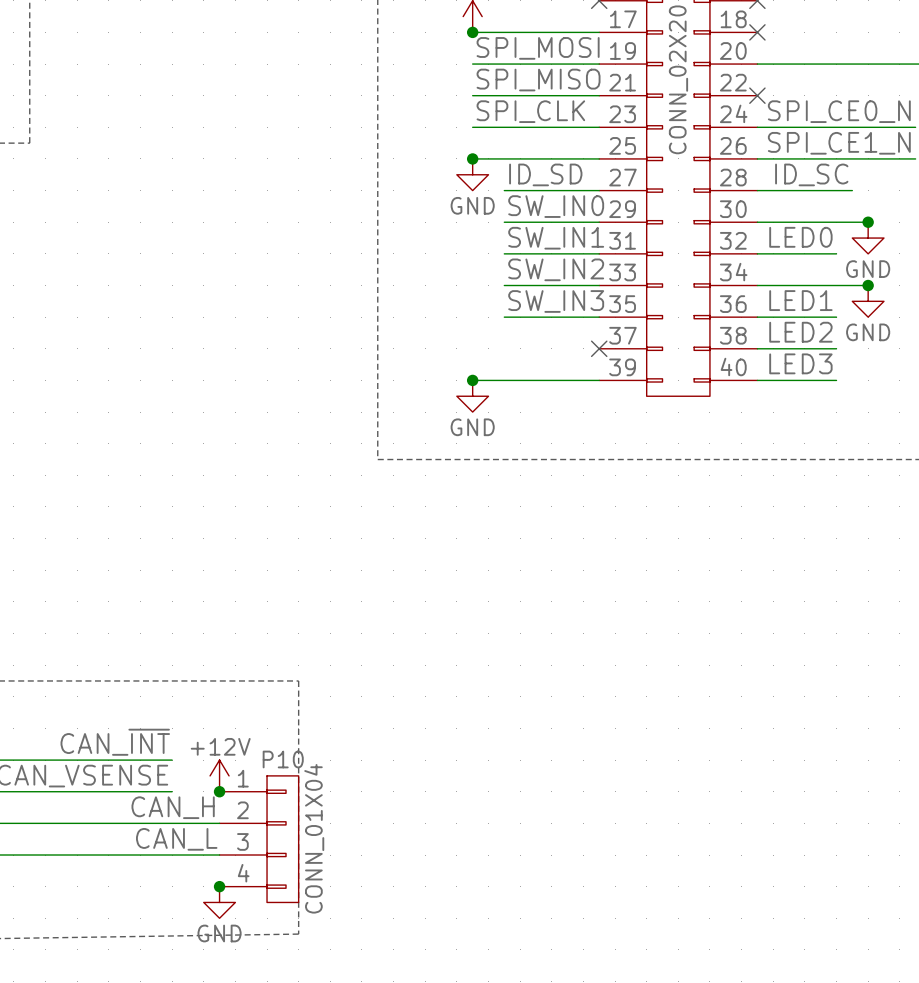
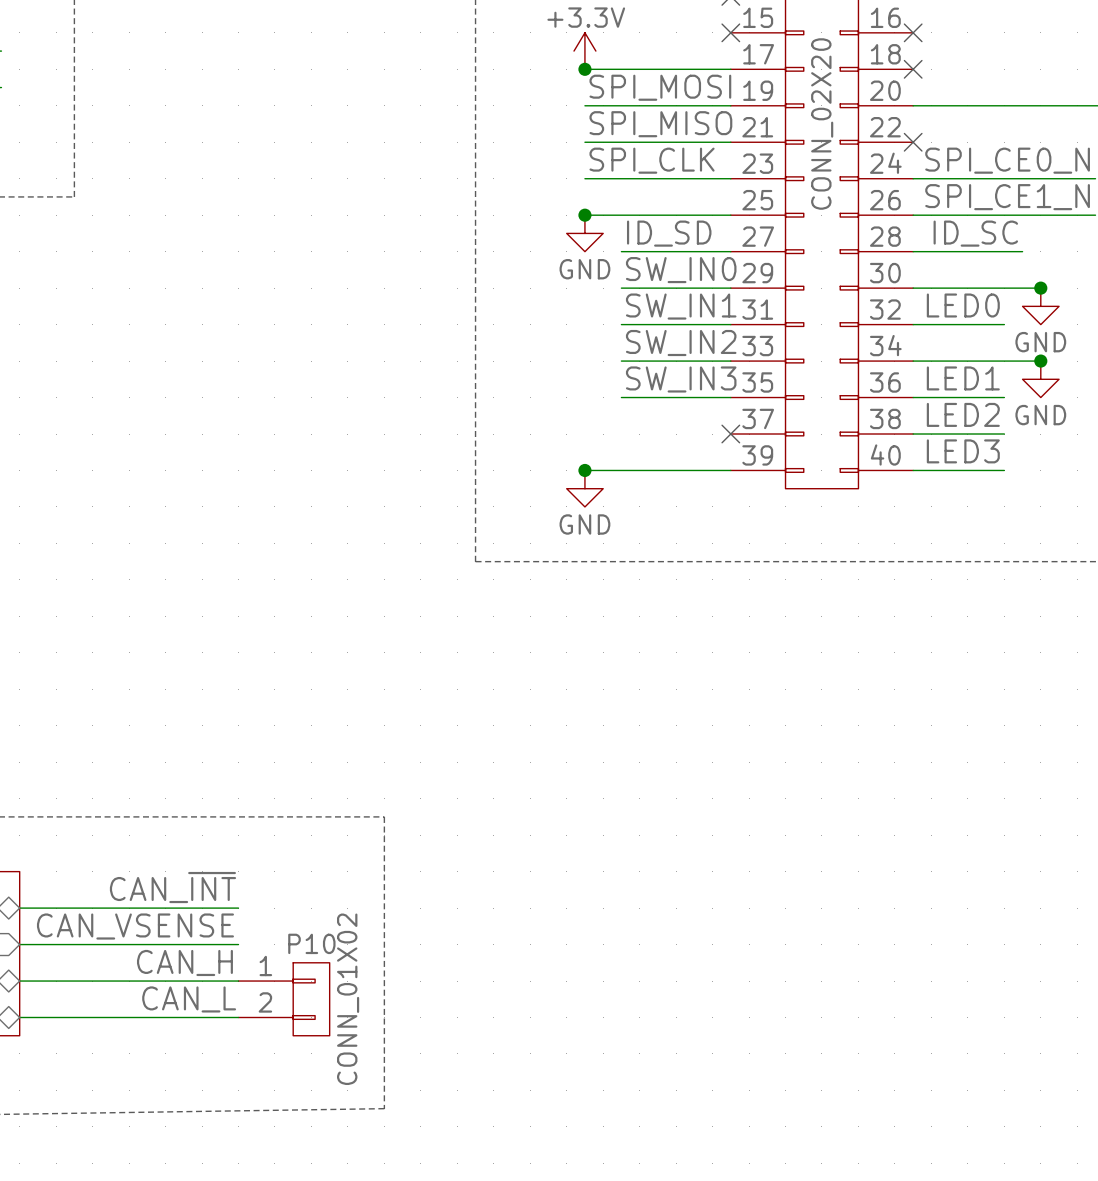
P10 name position: P10 (283, 759) -> P10 (311, 943)
P10 symbol: [219, 775, 299, 903] -> [238, 962, 330, 1036]
power symbol: +12V (219, 775) -> none
junction: (219, 791) -> none
label position: CAN_H (173, 807) -> CAN_H (184, 962)
P10 value: CONN_01X04 (314, 838) -> CONN_01X02 (348, 999)
label position: CAN_L (176, 839) -> CAN_L (189, 999)
junction: (219, 886) -> none
power symbol: GND (219, 902) -> none

